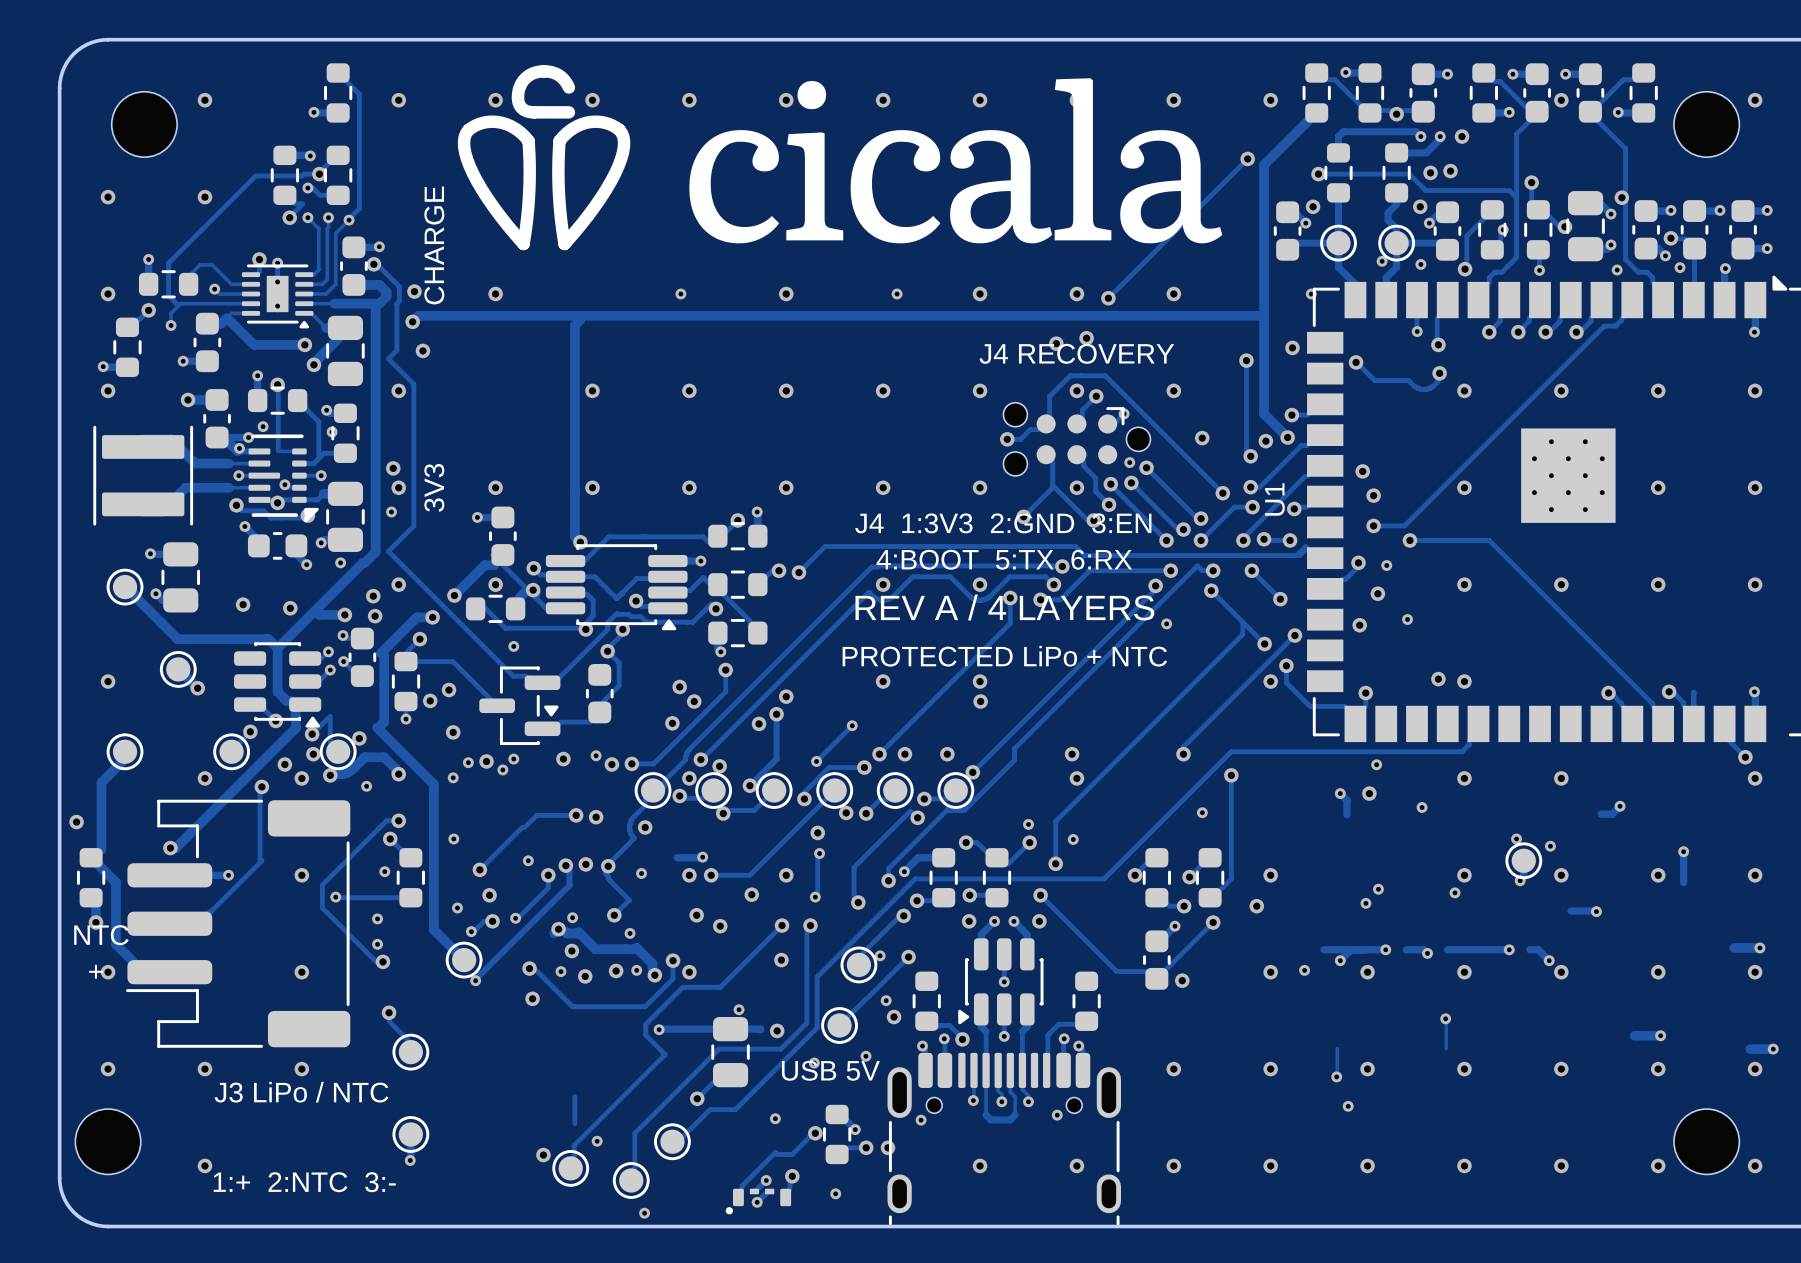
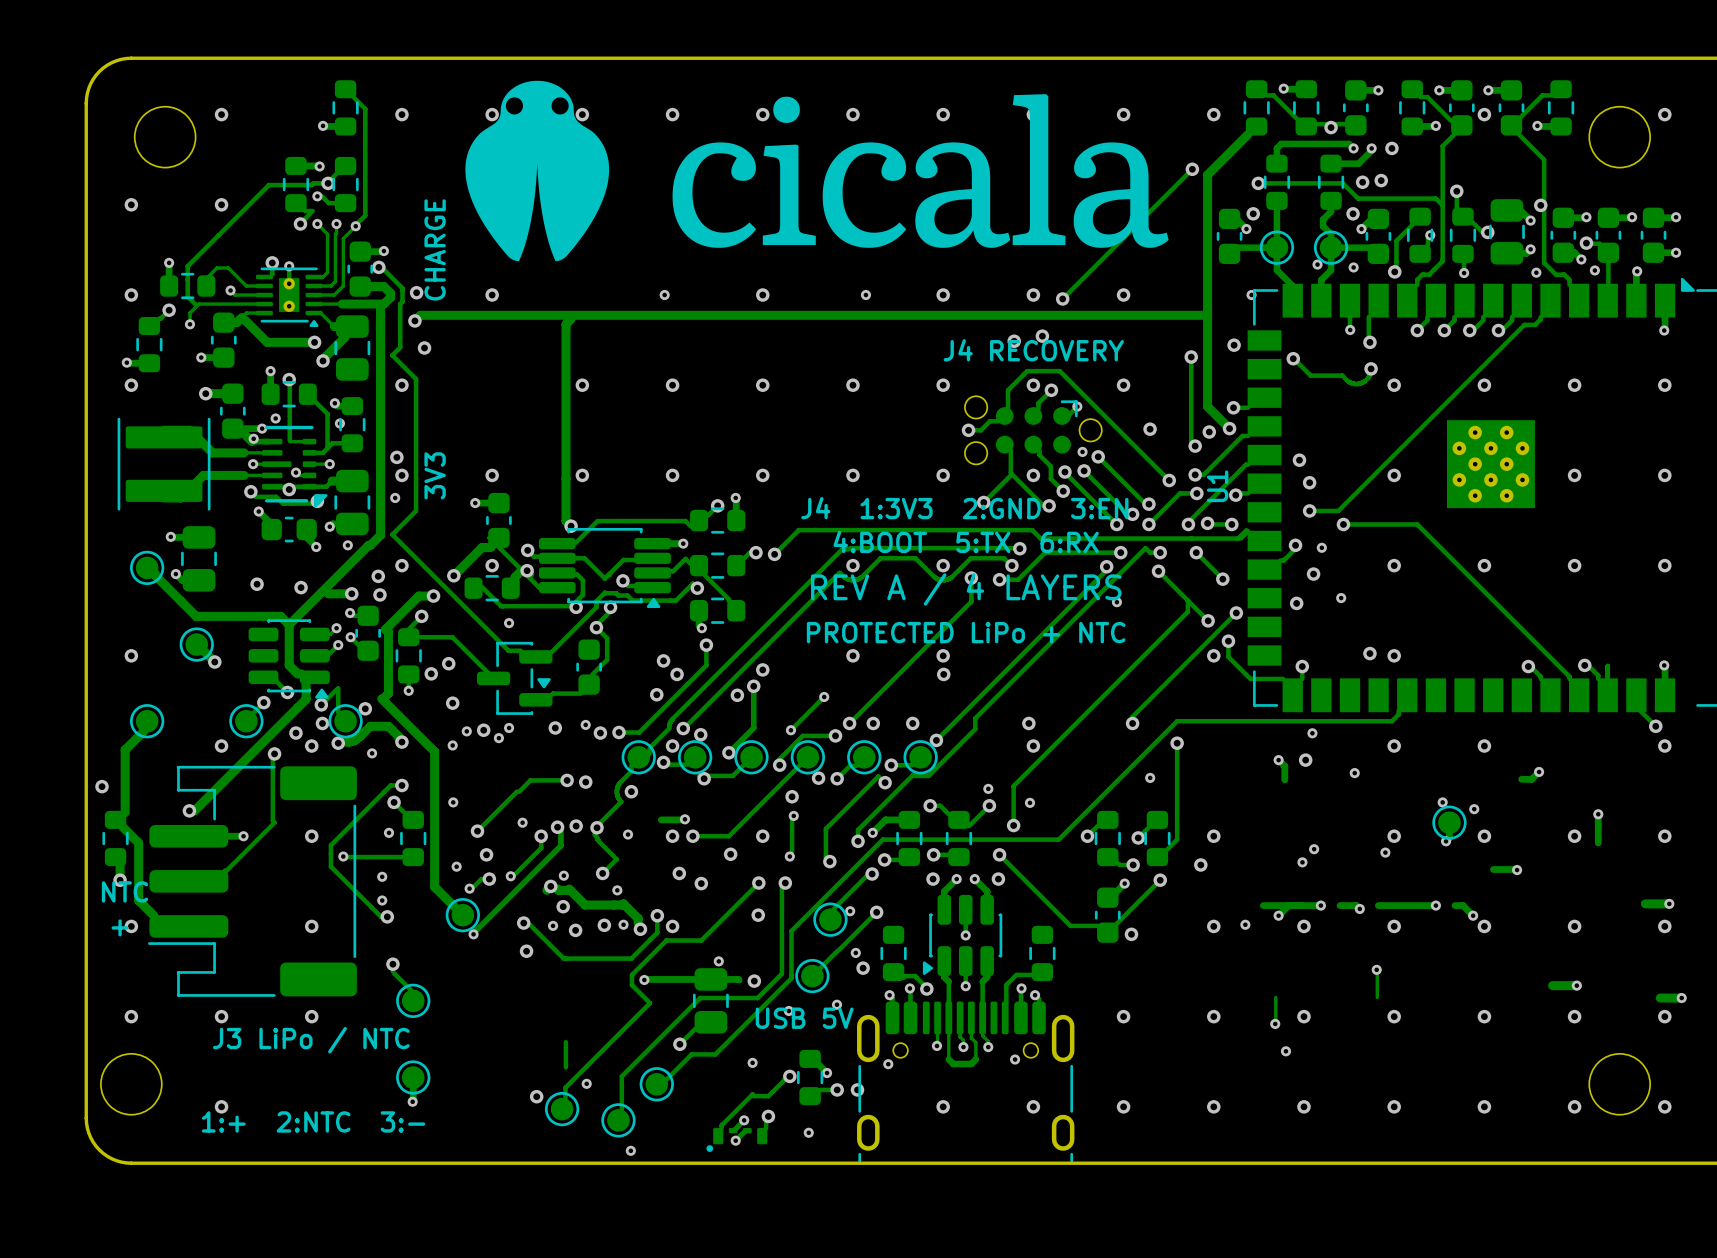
drawing: none -> [465, 80, 610, 262]
line: (568, 87) (564, 80) (557, 74) (548, 71) (538, 71) (530, 74) (523, 80) (517, 97) (520, 106) (527, 111) (568, 112) -> none
line: (468, 129) (483, 122) (499, 122) (514, 128) (528, 140) (529, 190) (523, 244) (493, 206) (472, 173) (464, 146) (464, 136) (468, 129) -> none
line: (619, 129) (604, 122) (588, 122) (573, 128) (559, 140) (558, 190) (564, 244) (594, 206) (615, 173) (623, 146) (623, 136) (619, 129) -> none

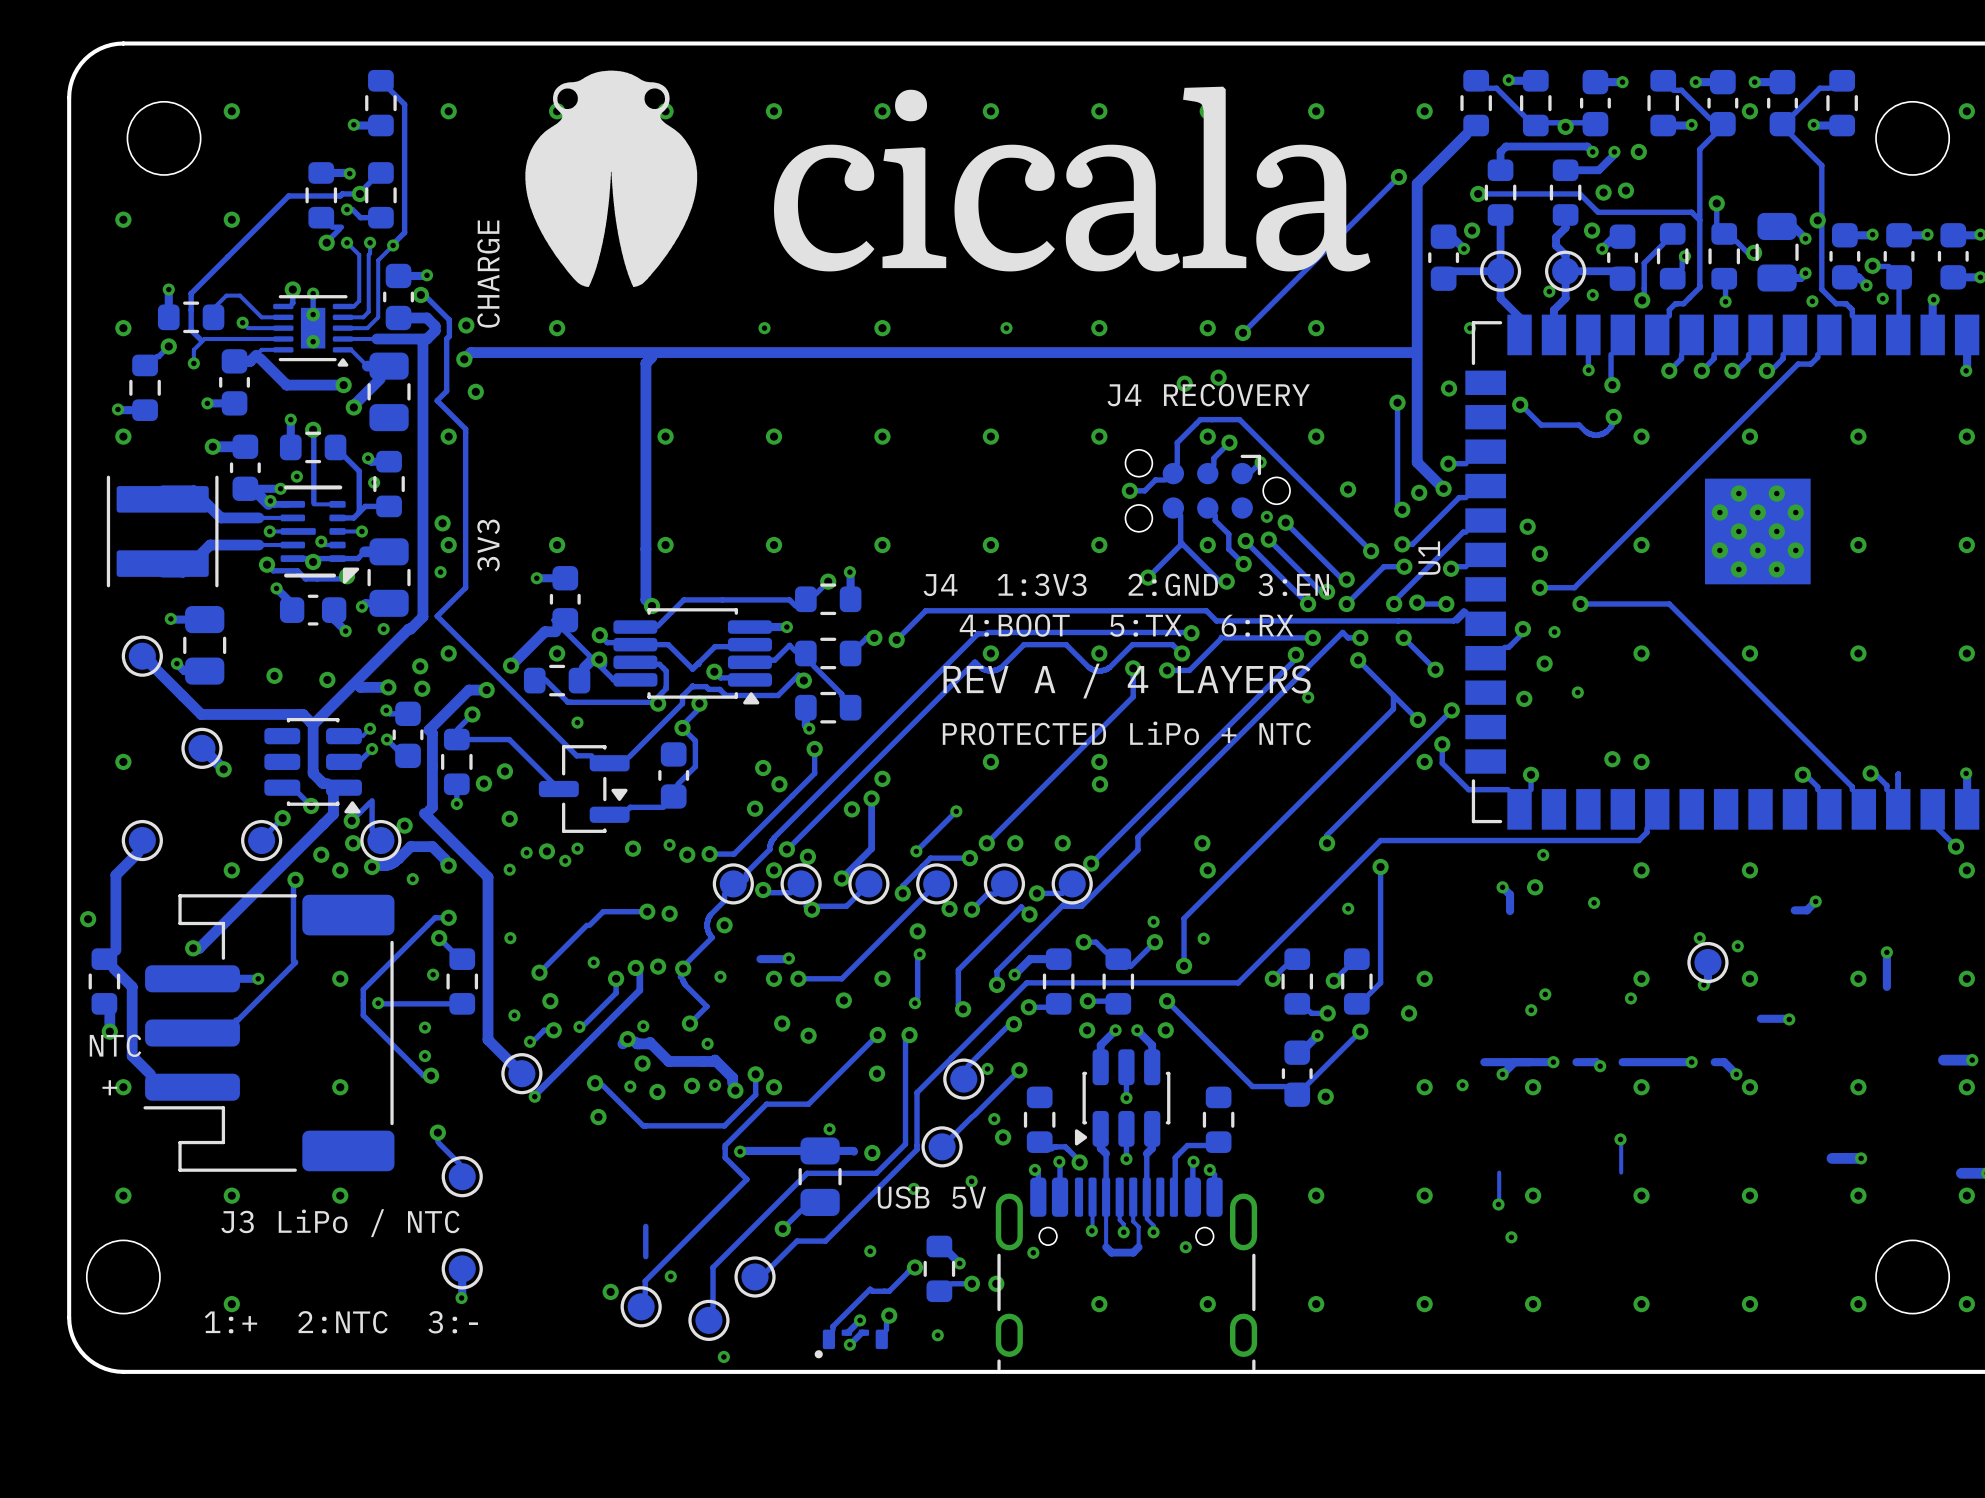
drawing shape: [465, 80, 610, 262] -> [525, 70, 698, 288]

